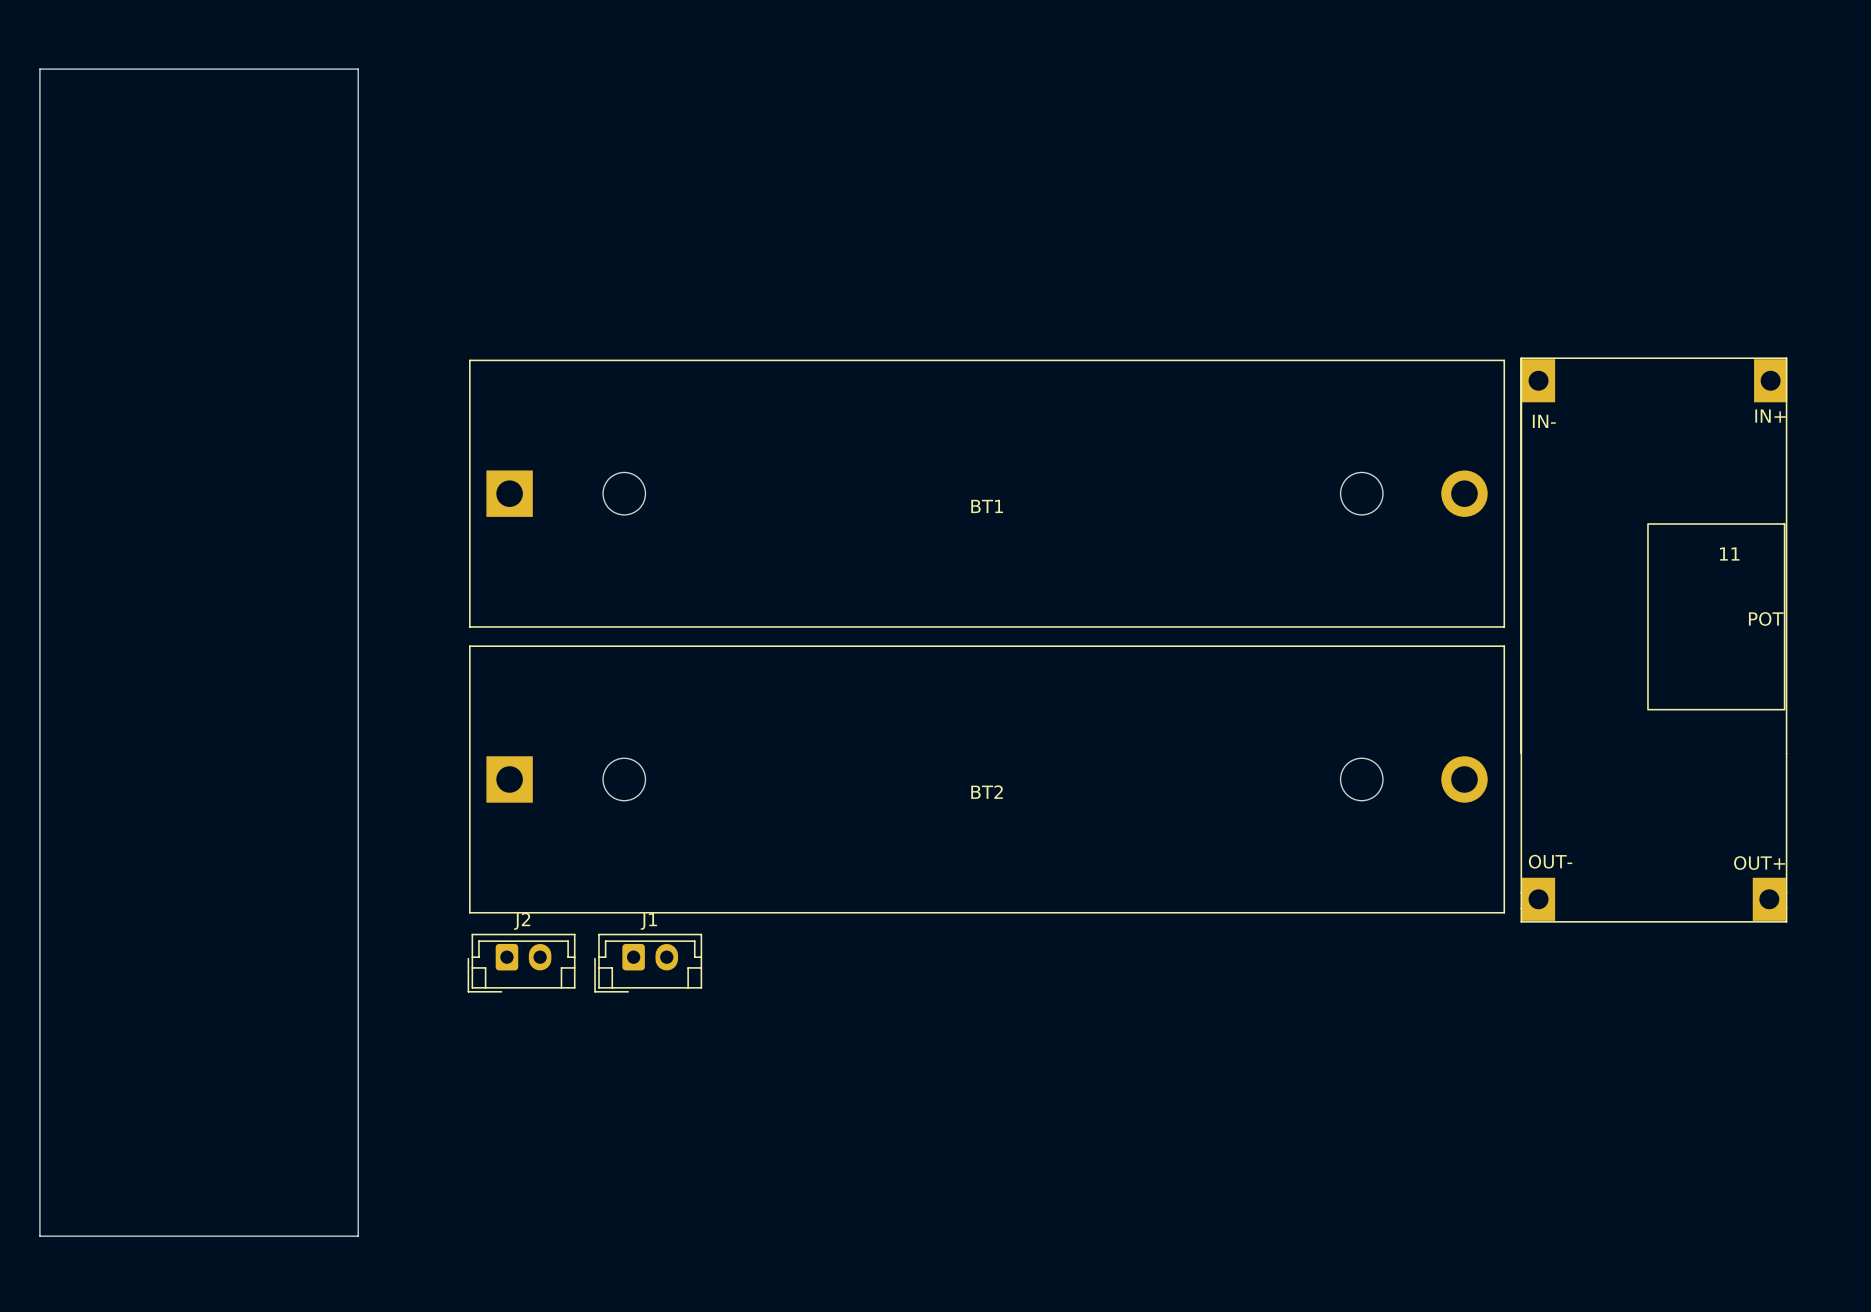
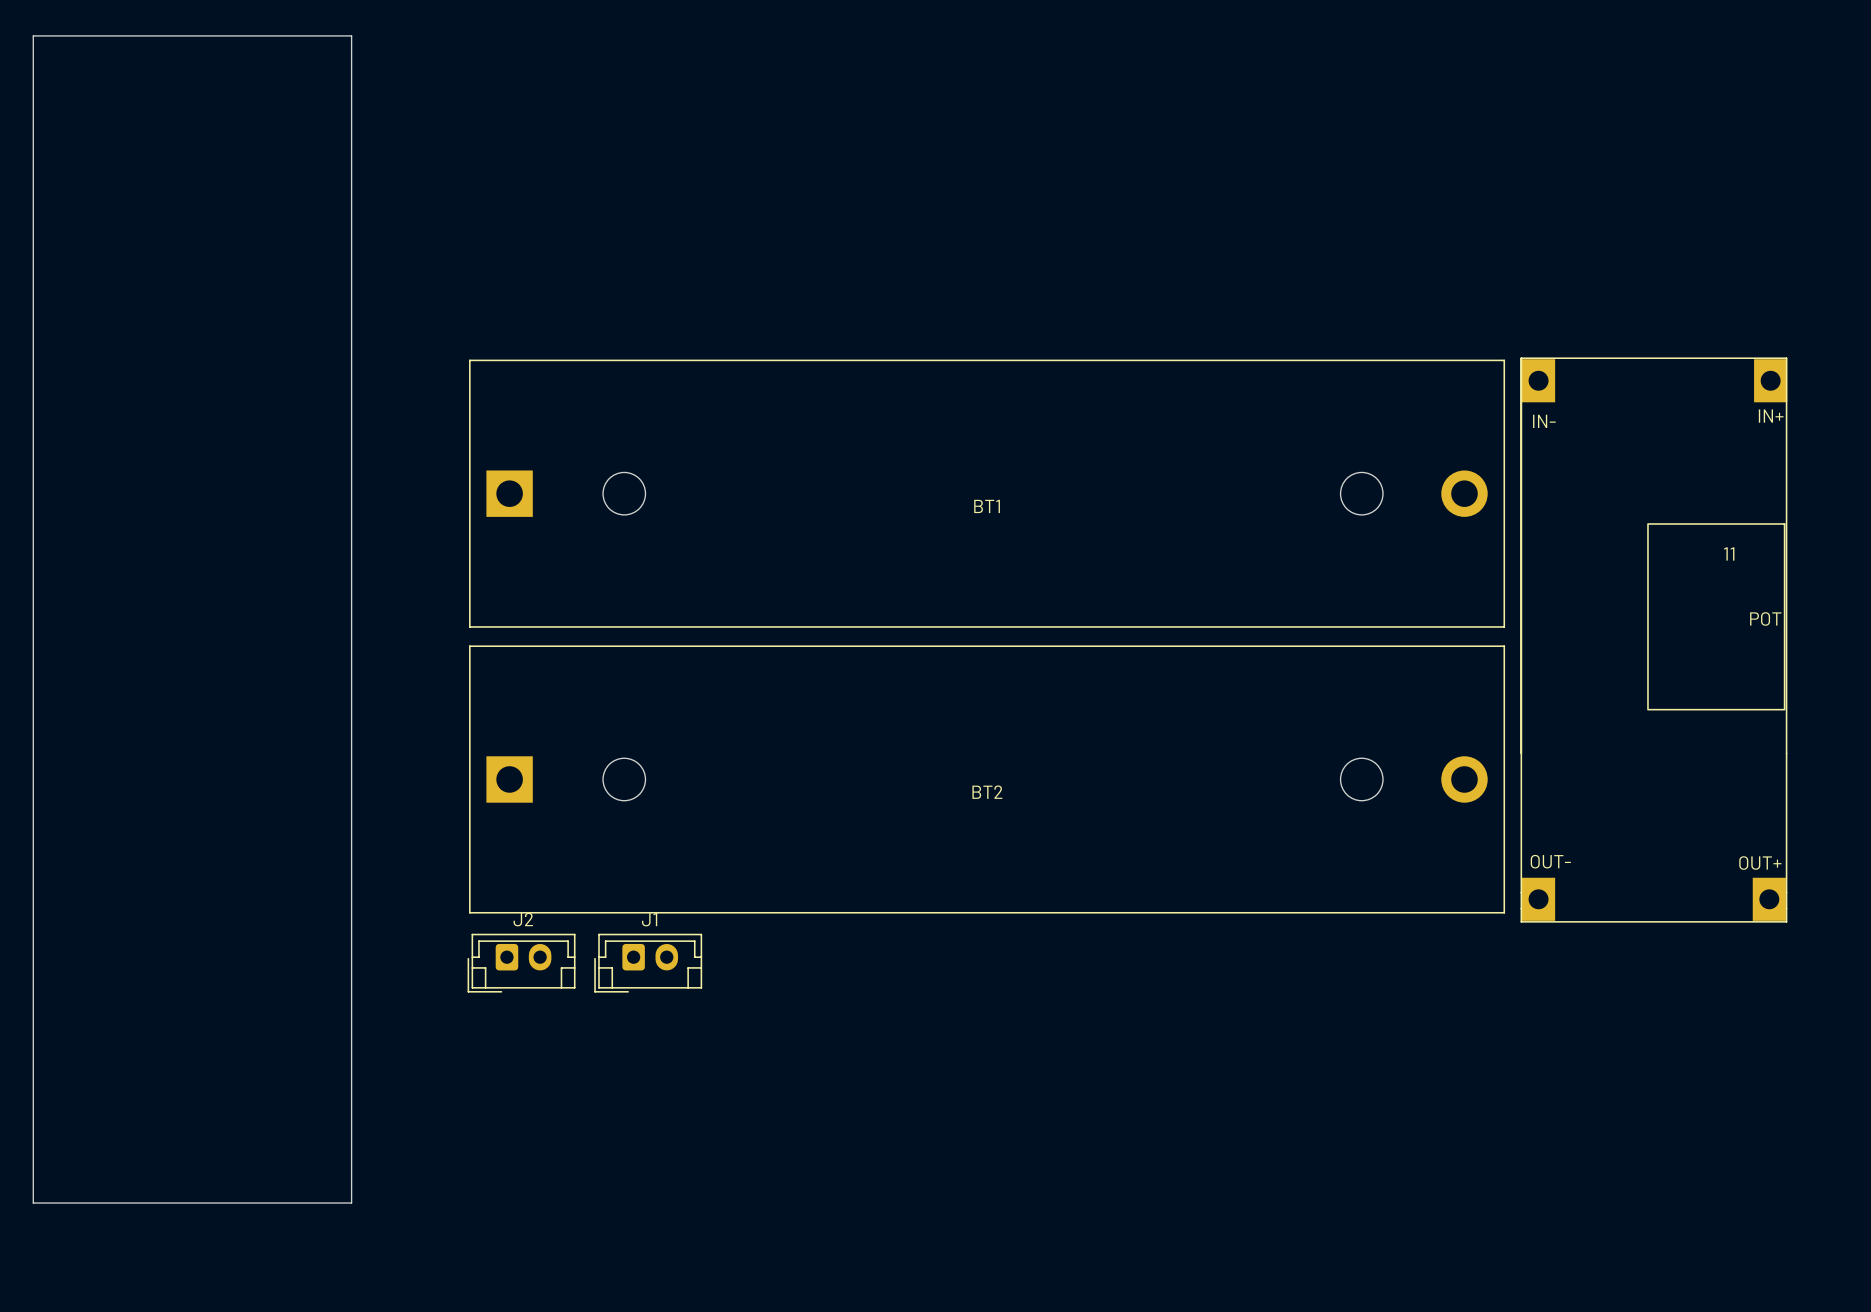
board edge: (39, 69) (358, 69) (358, 1236) (39, 1236) (39, 69) -> (33, 35) (351, 35) (351, 1203) (33, 1203) (33, 35)

